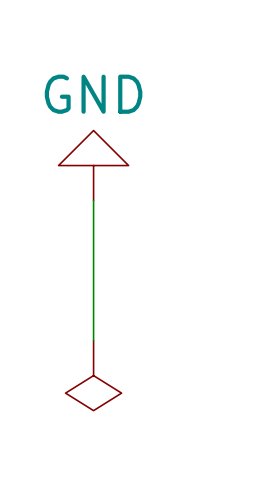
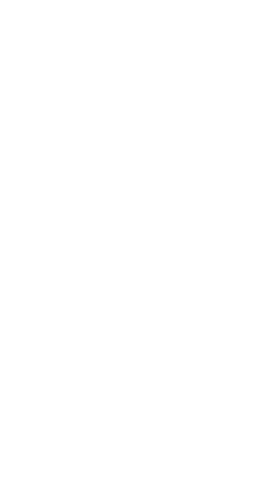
power symbol: GND (93, 165) -> none
wire: (93, 200) (93, 340) -> none
power symbol: (93, 375) -> none

